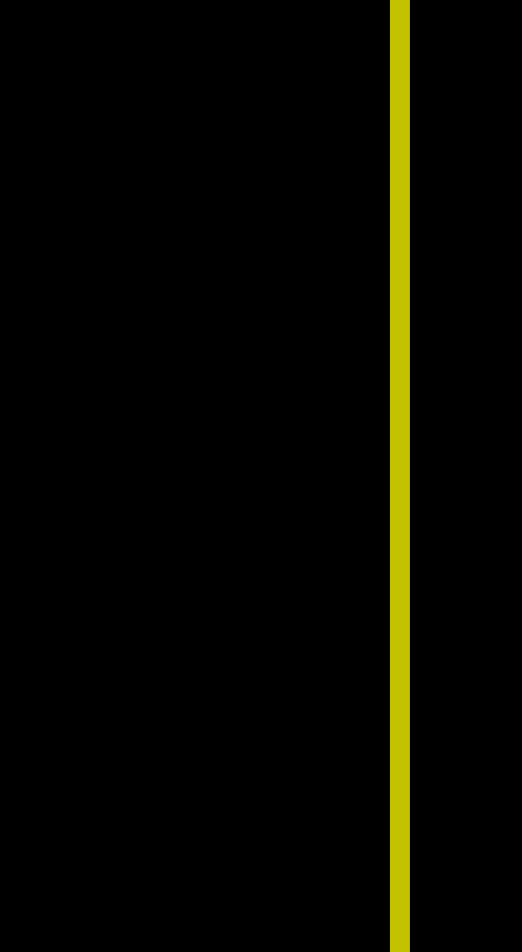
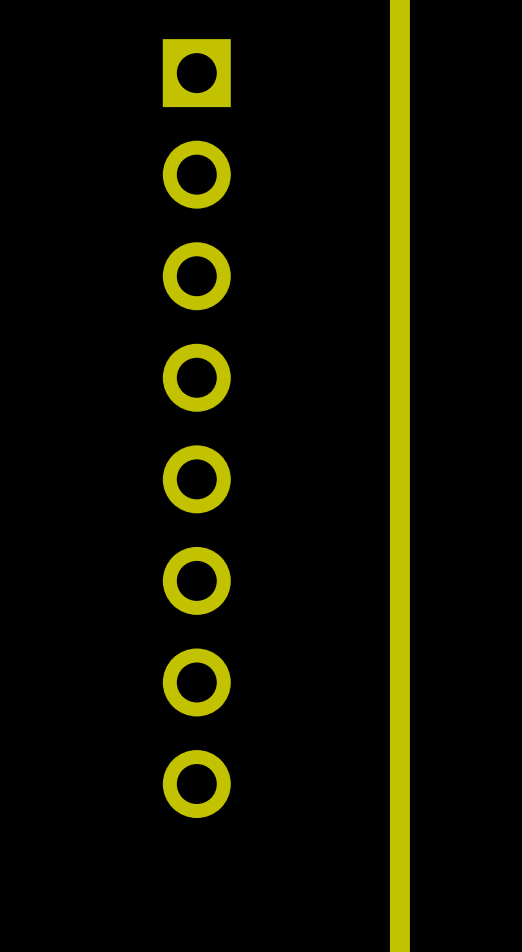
part: none -> (196, 428)

